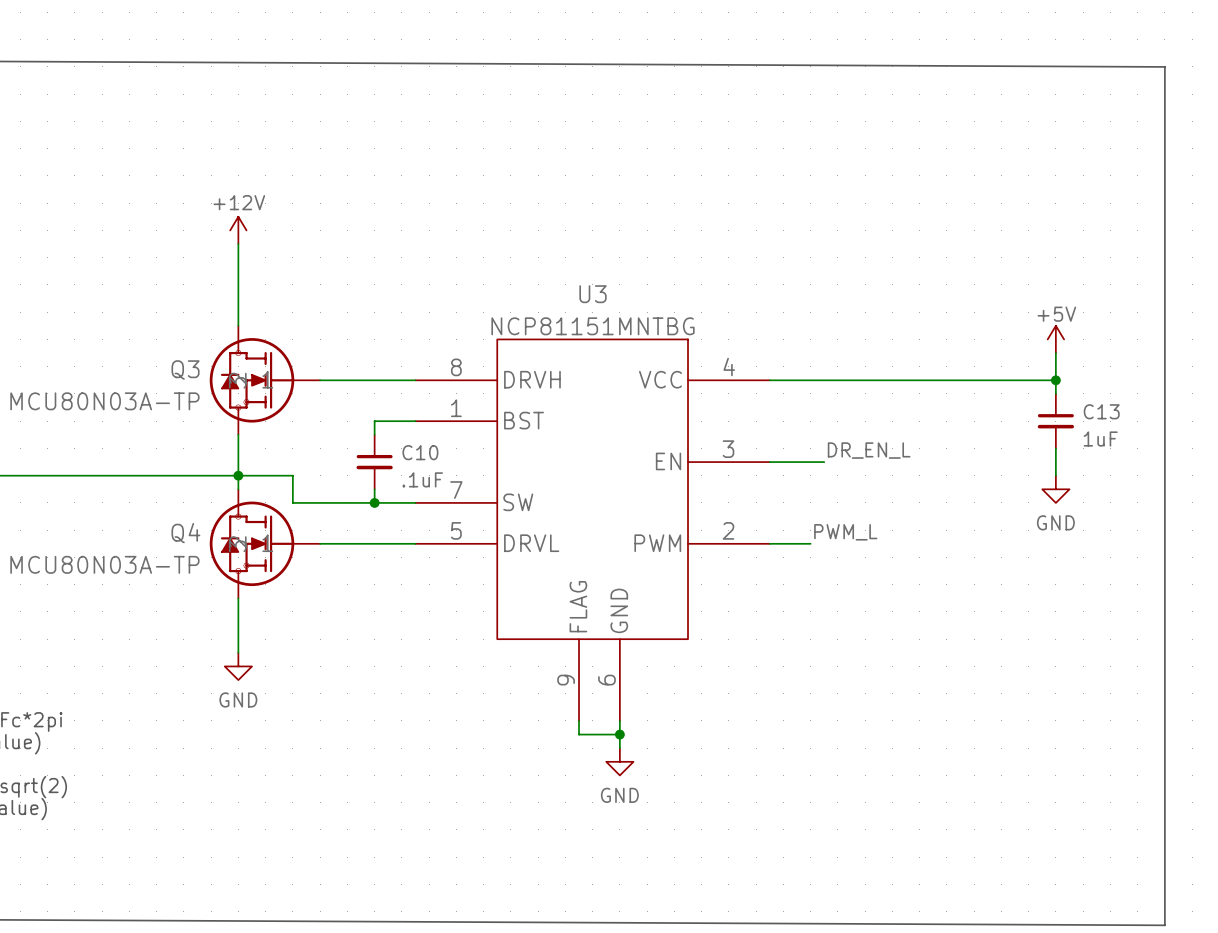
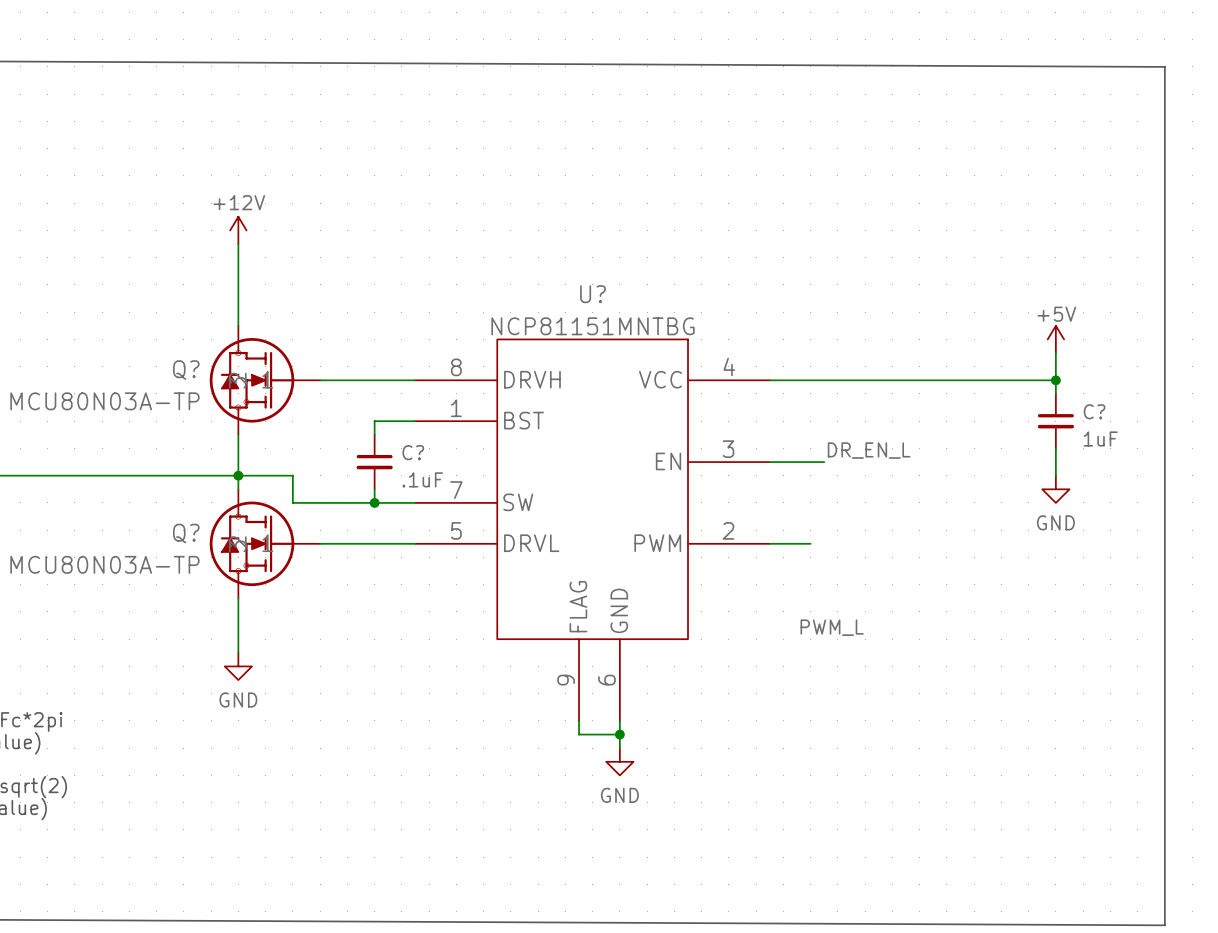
U3 name: U3 (593, 294) -> U? (593, 294)
Q3 name: Q3 (185, 370) -> Q? (186, 370)
C13 name: C13 (1101, 411) -> C? (1094, 411)
C10 name: C10 (420, 452) -> C? (413, 452)
label position: PWM_L (845, 532) -> PWM_L (832, 627)
Q4 name: Q4 (185, 533) -> Q? (186, 533)

